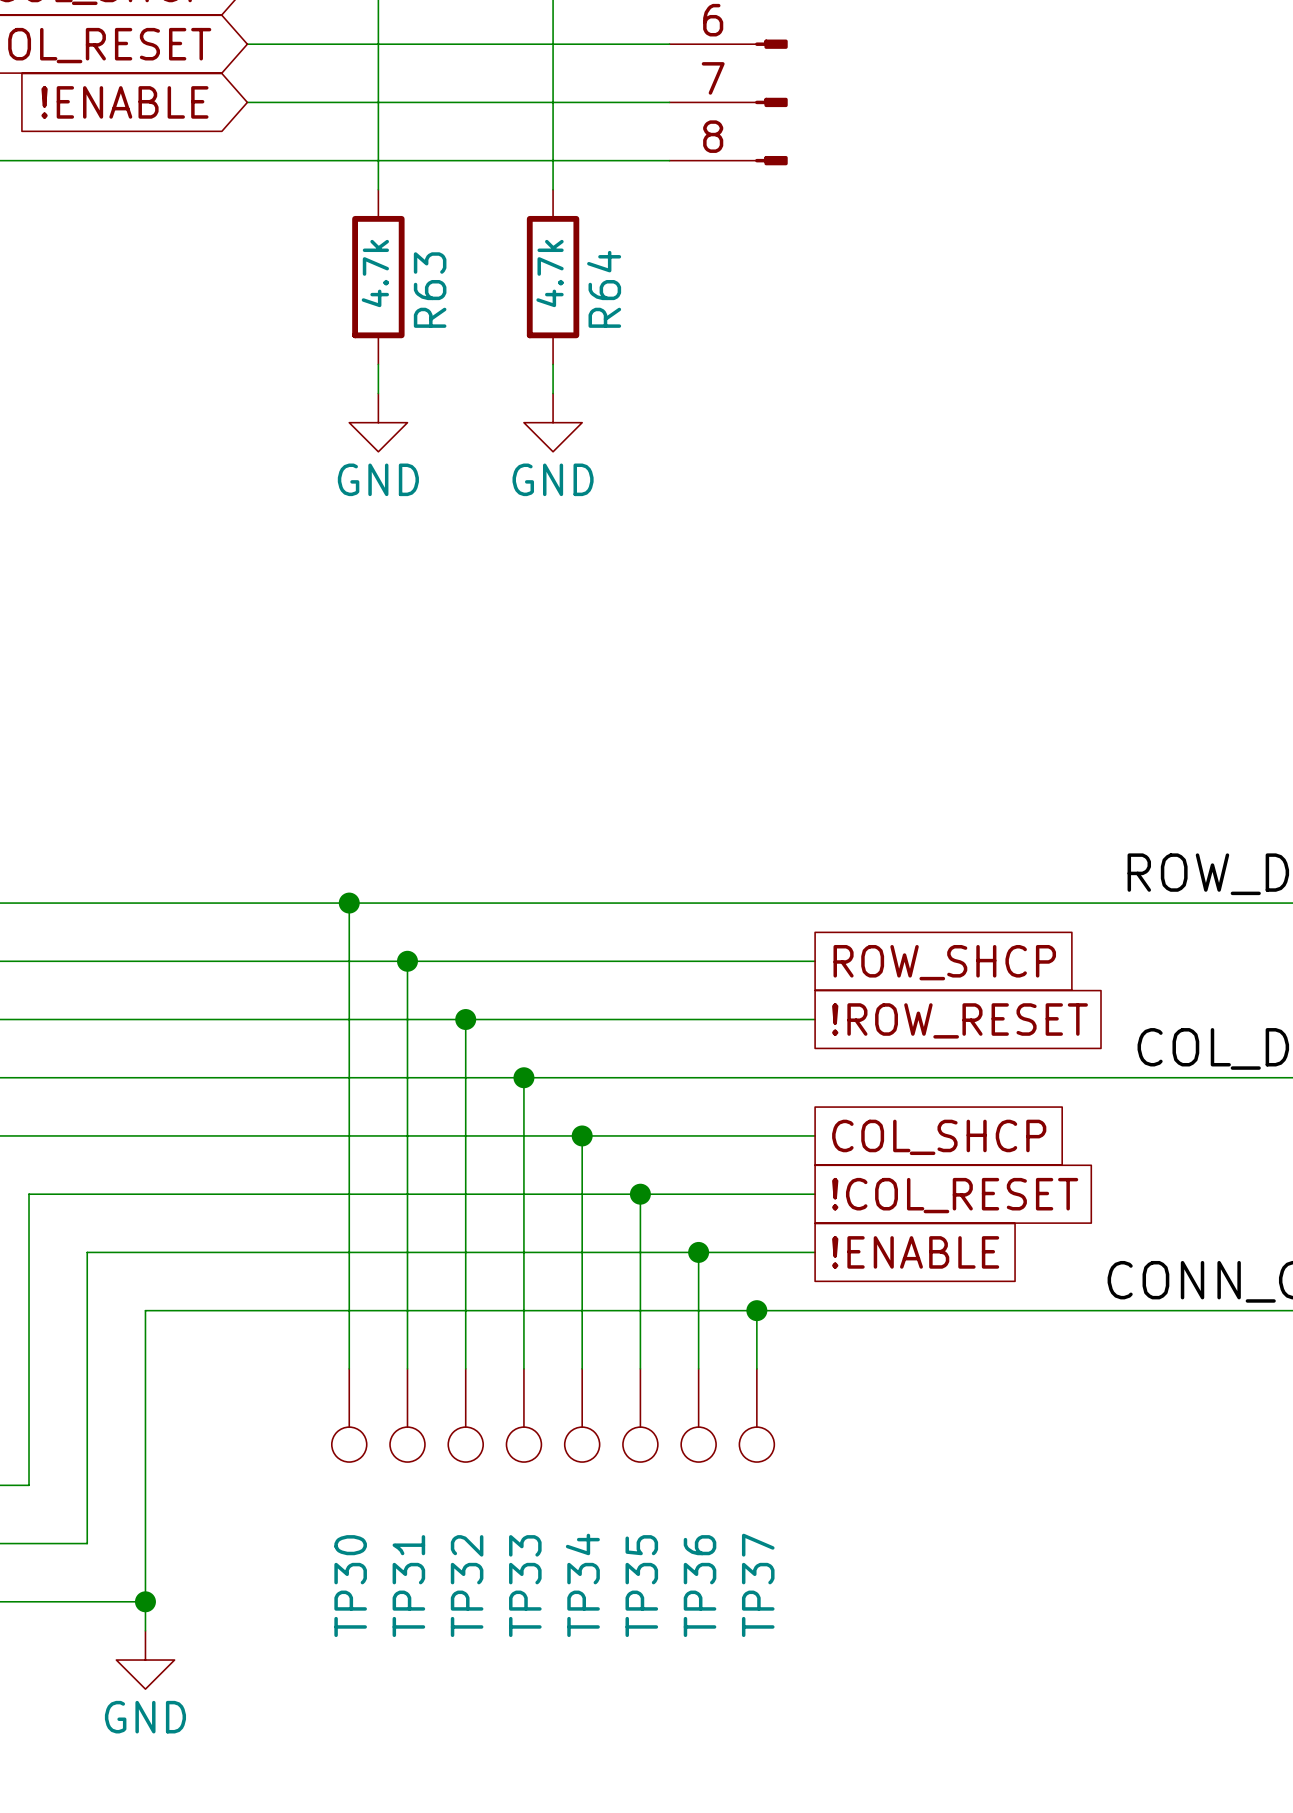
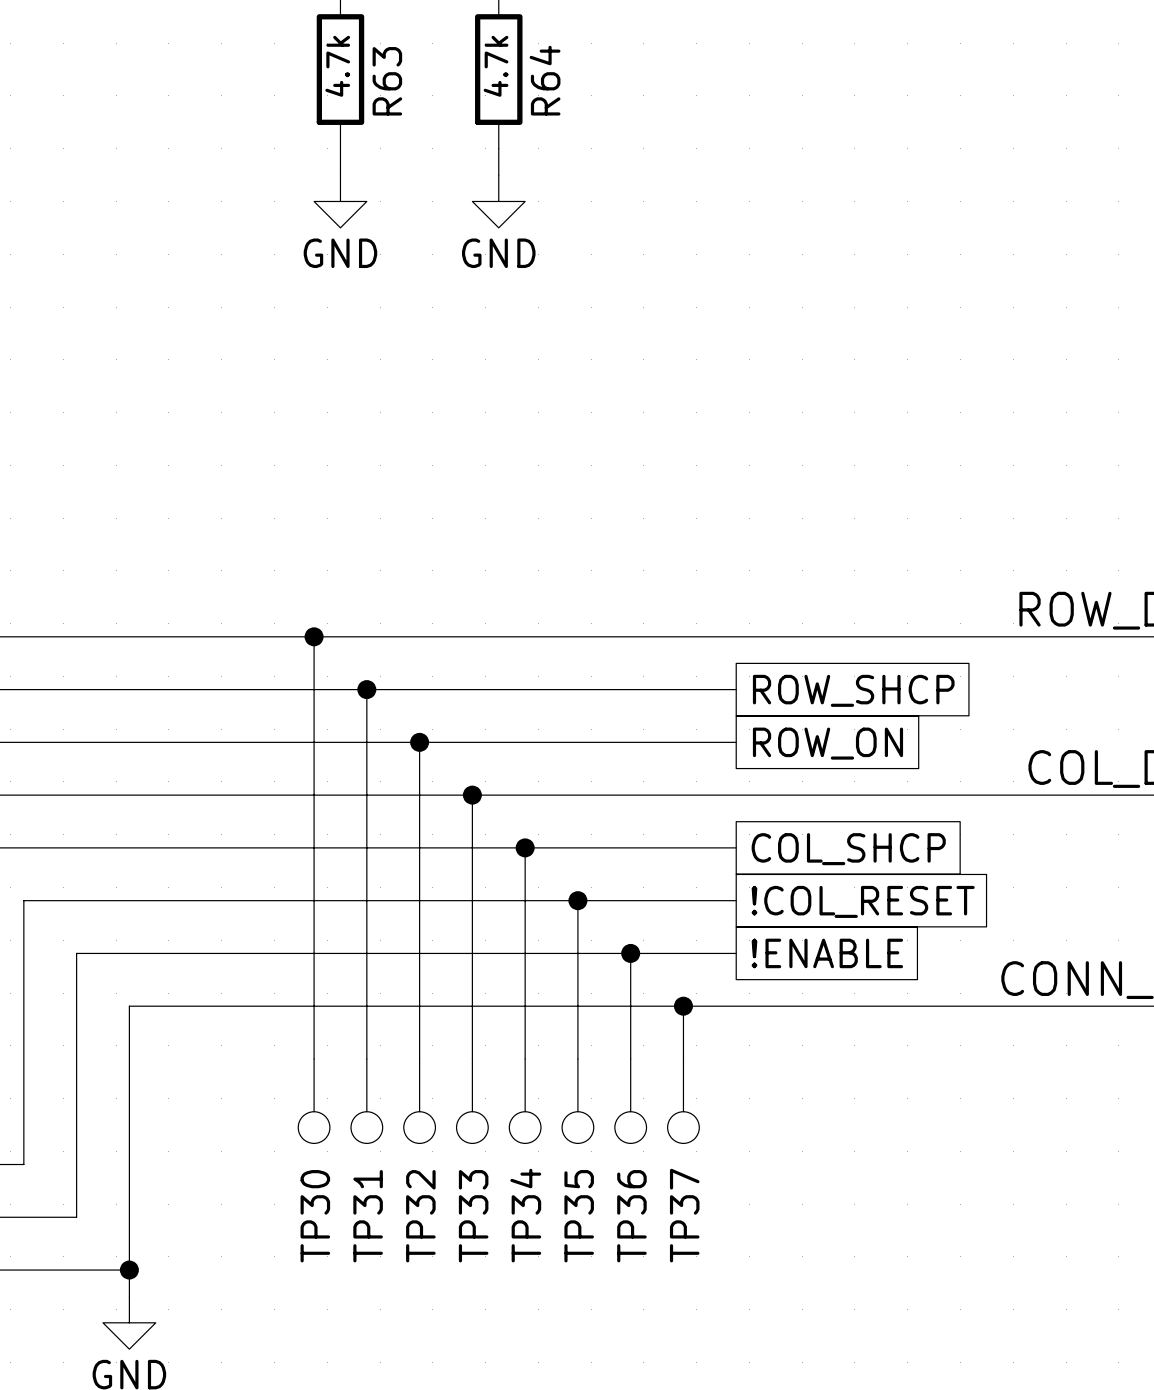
global label: !ROW_RESET (960, 1020) -> ROW_ON (827, 743)
TP34 name position: TP34 (582, 1585) -> TP34 (525, 1215)
TP37 name position: TP37 (758, 1585) -> TP37 (684, 1215)
TP30 name position: TP30 (350, 1586) -> TP30 (315, 1216)
TP31 name position: TP31 (408, 1586) -> TP31 (368, 1216)
TP32 name position: TP32 (467, 1586) -> TP32 (420, 1216)
TP33 name position: TP33 (525, 1586) -> TP33 (473, 1216)
TP35 name position: TP35 (641, 1586) -> TP35 (579, 1216)
TP36 name position: TP36 (700, 1586) -> TP36 (631, 1216)

